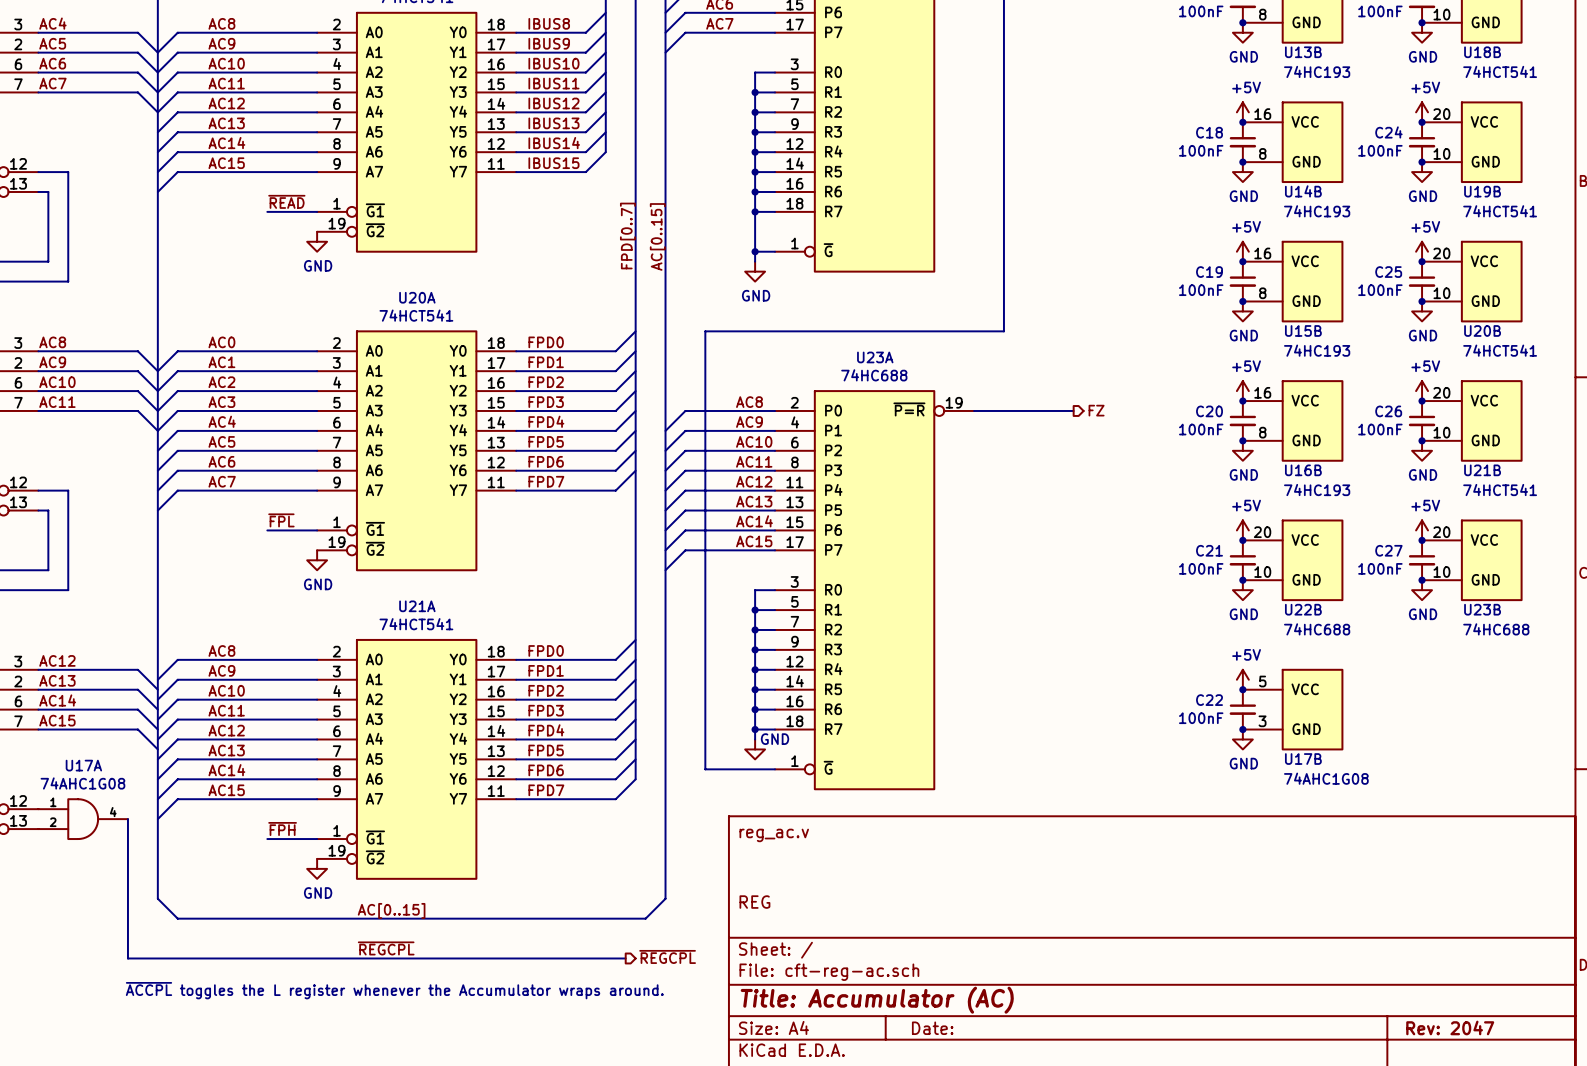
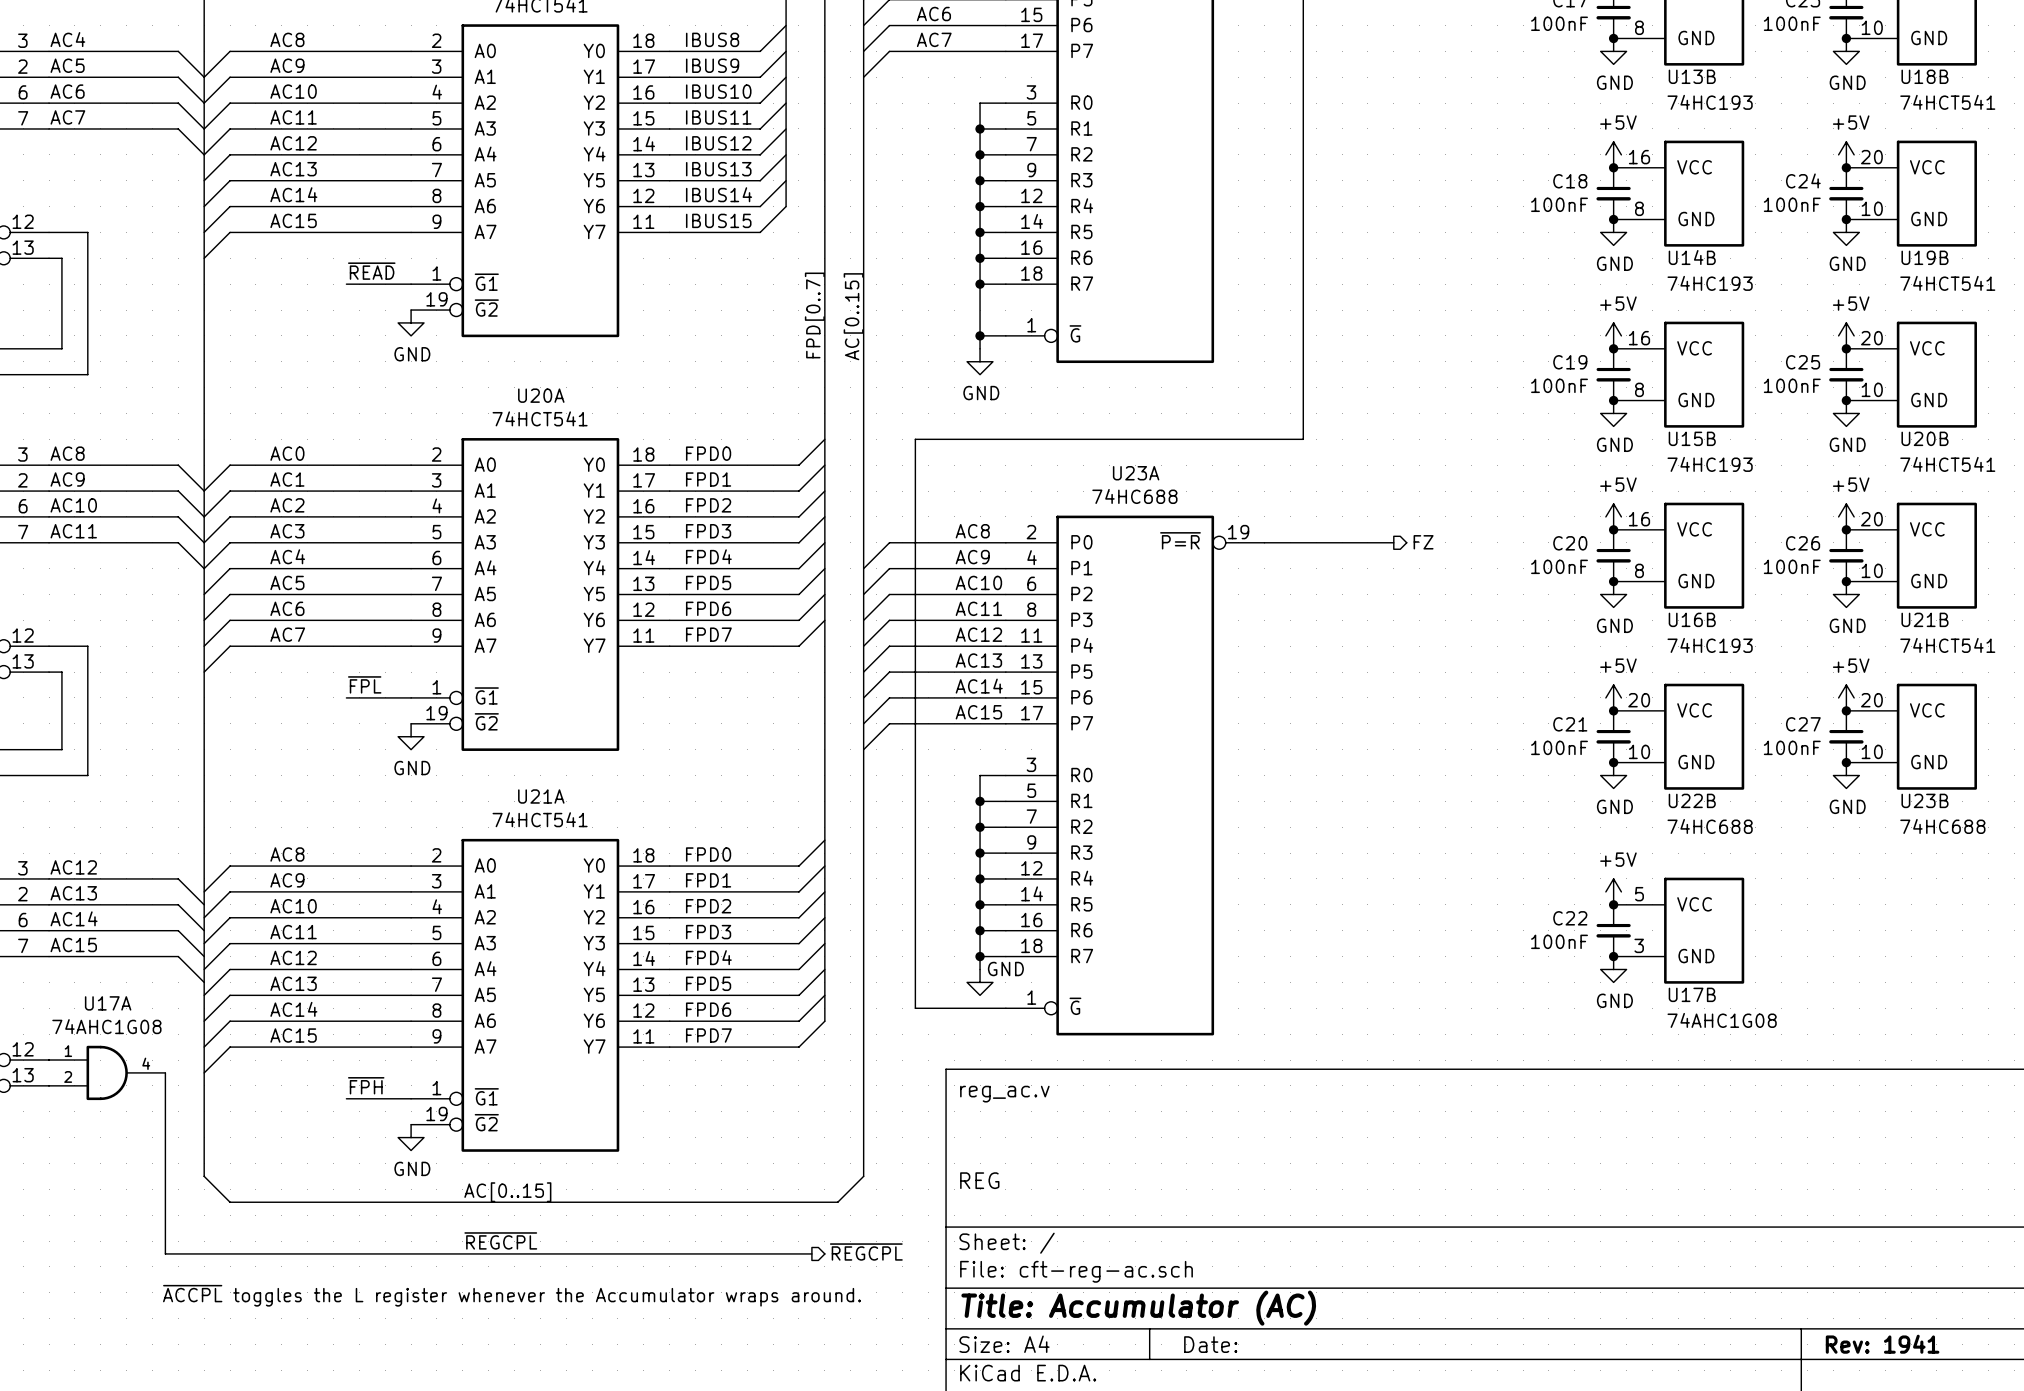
title block: Rev: 2047 (1450, 1027) -> Rev: 1941 (1882, 1344)

